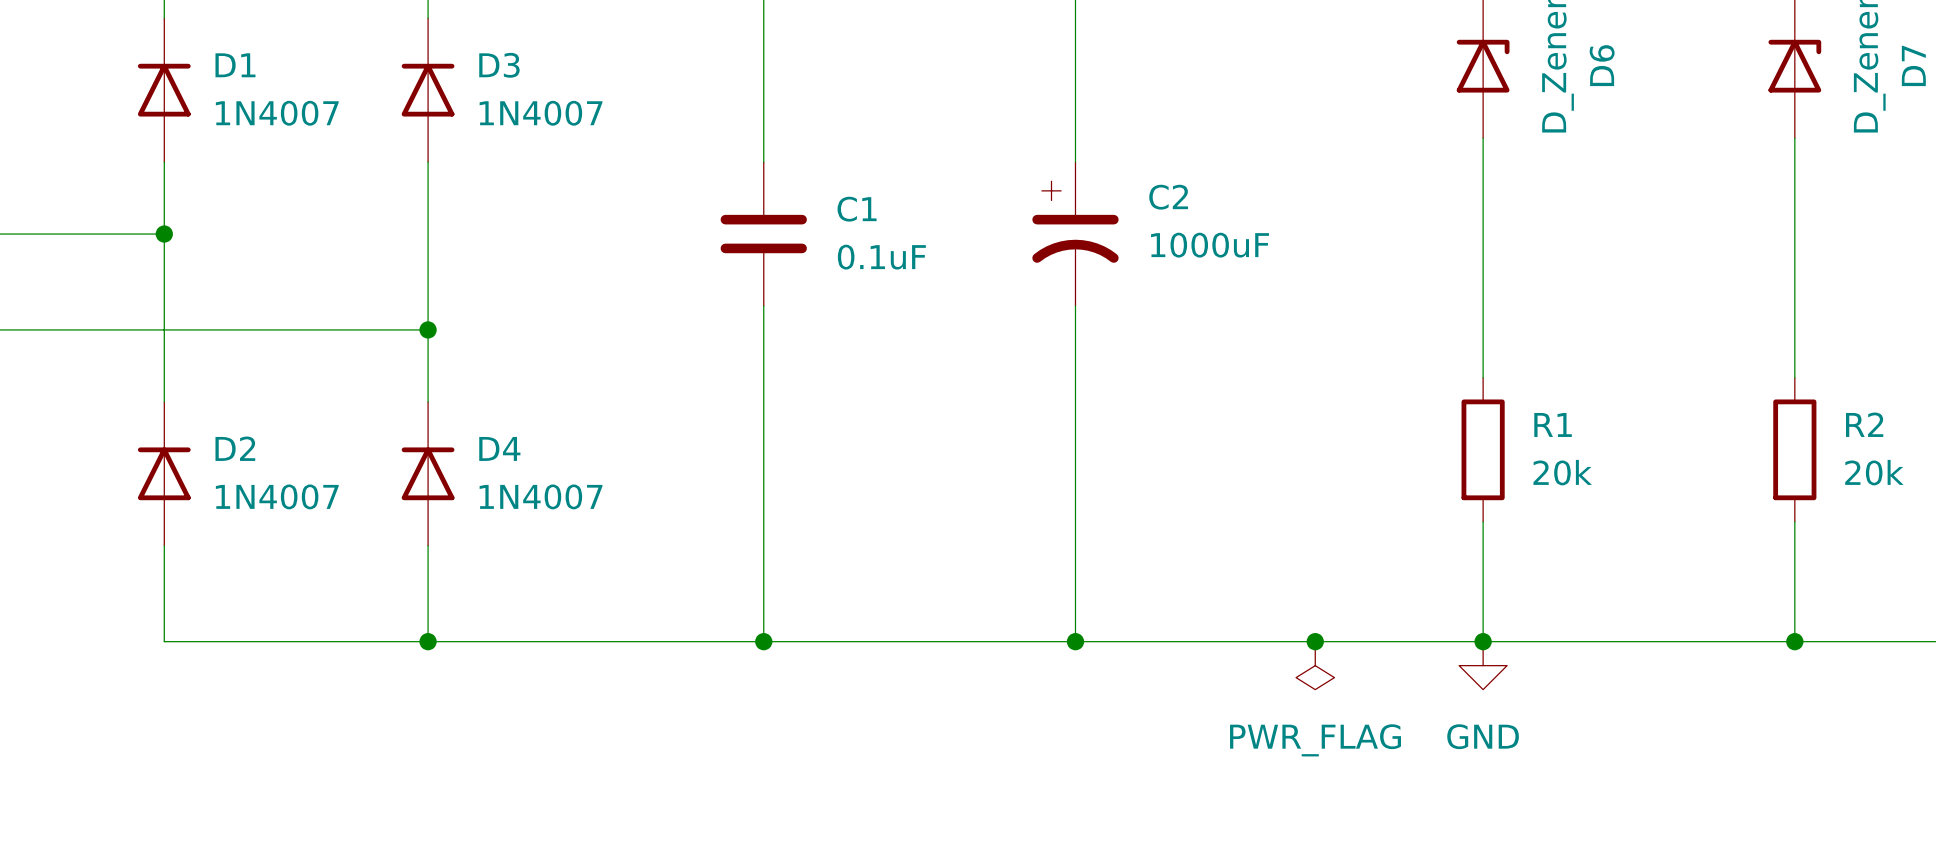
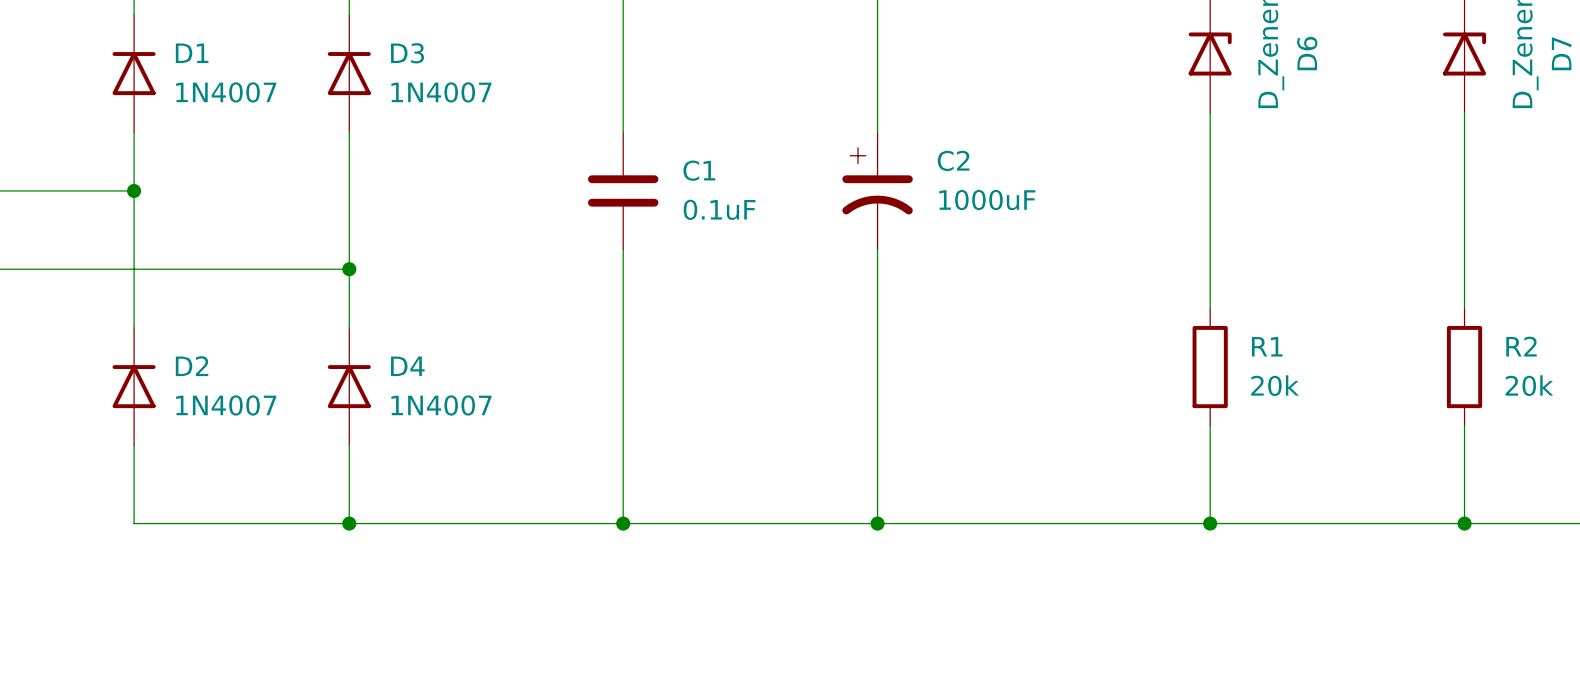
junction: (1315, 641) -> none
power symbol: PWR_FLAG (1315, 665) -> none
power symbol: GND (1483, 665) -> none

